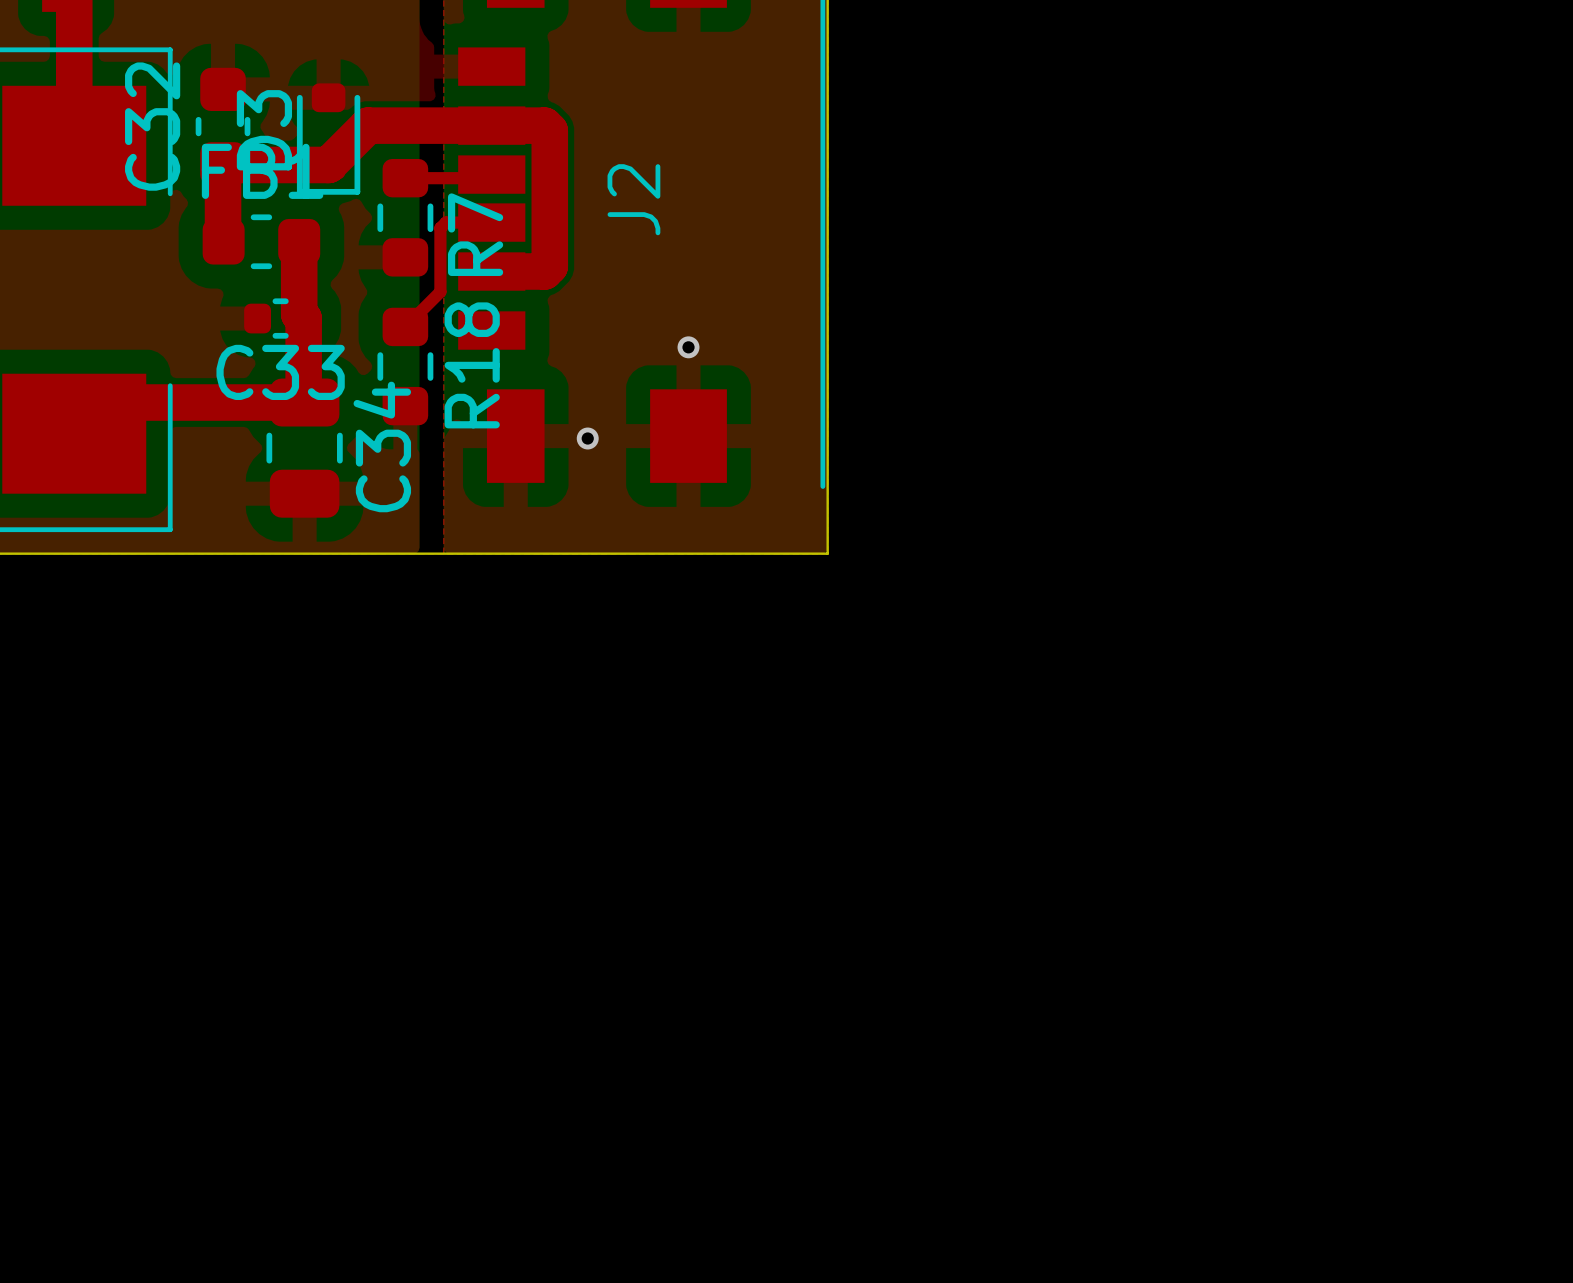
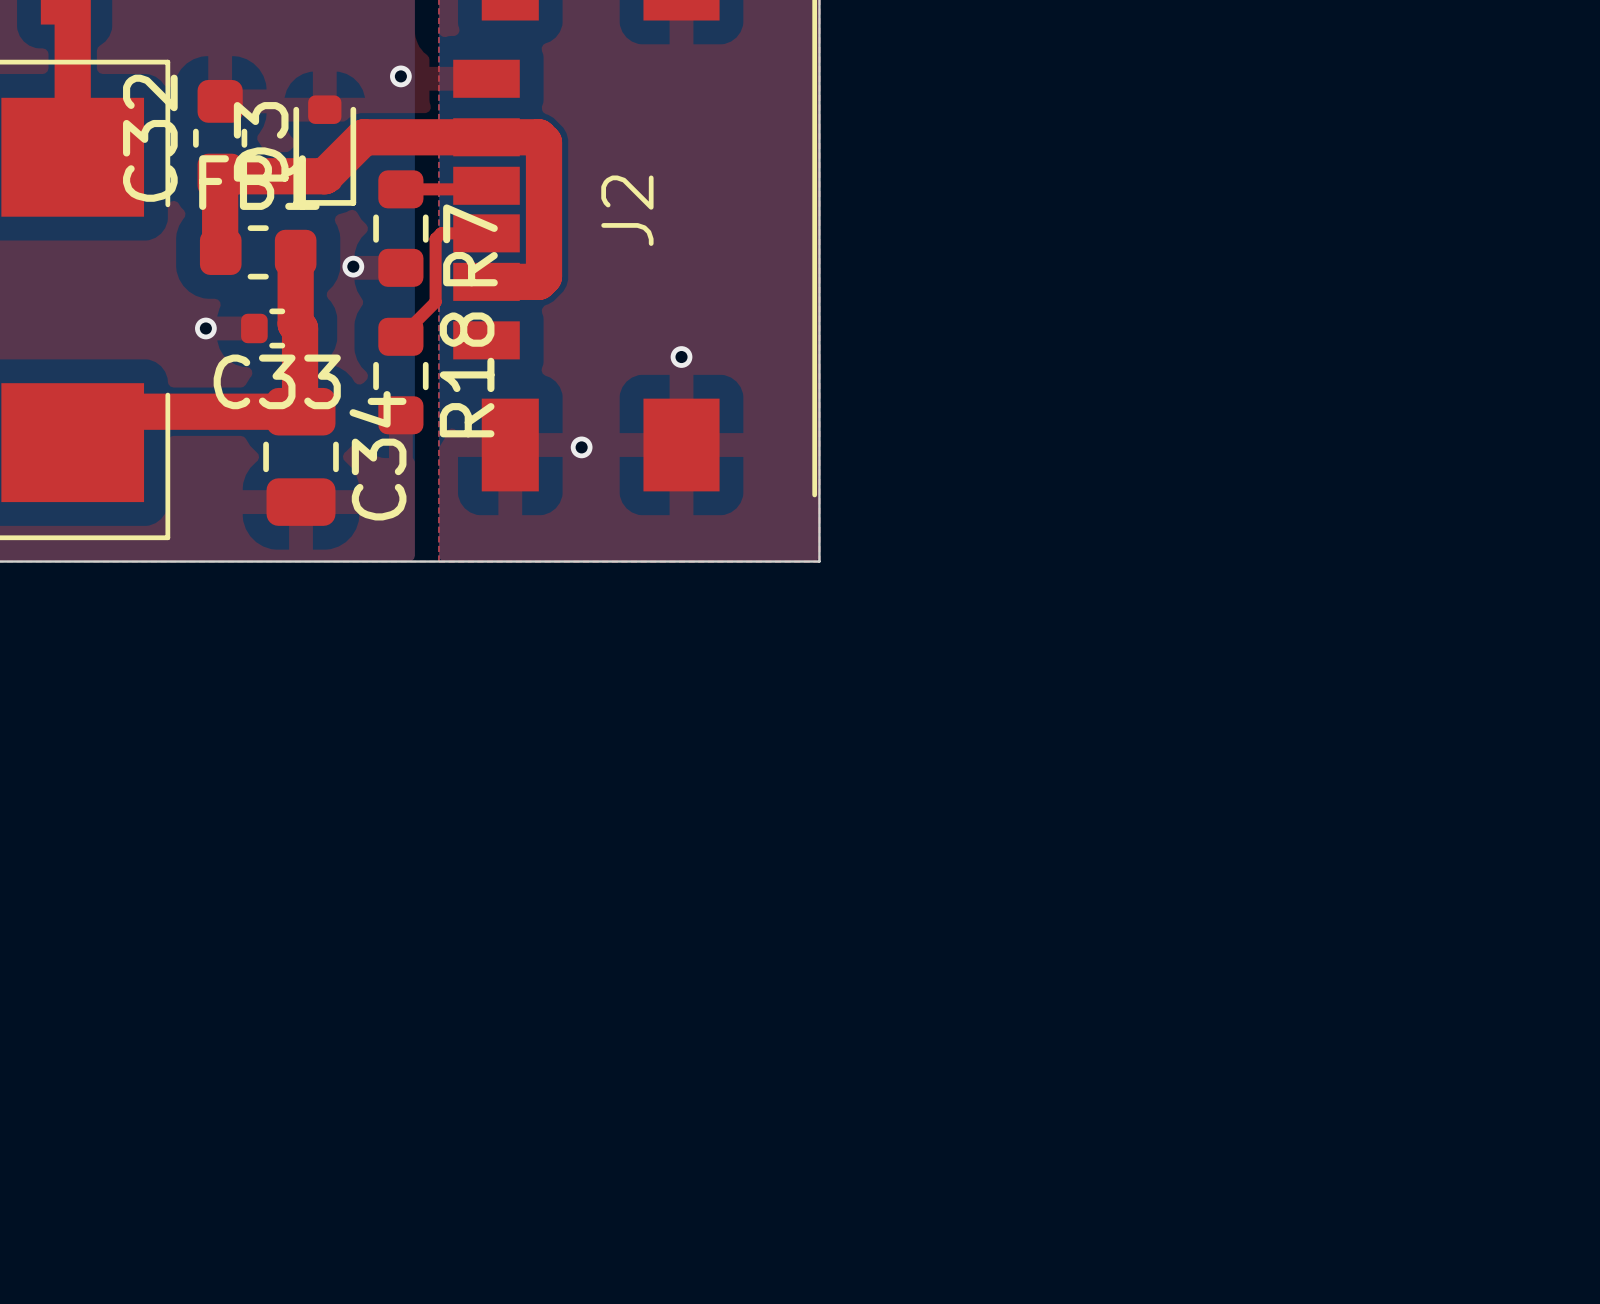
via: none -> (400, 76)
via: none -> (353, 266)
via: none -> (205, 328)

